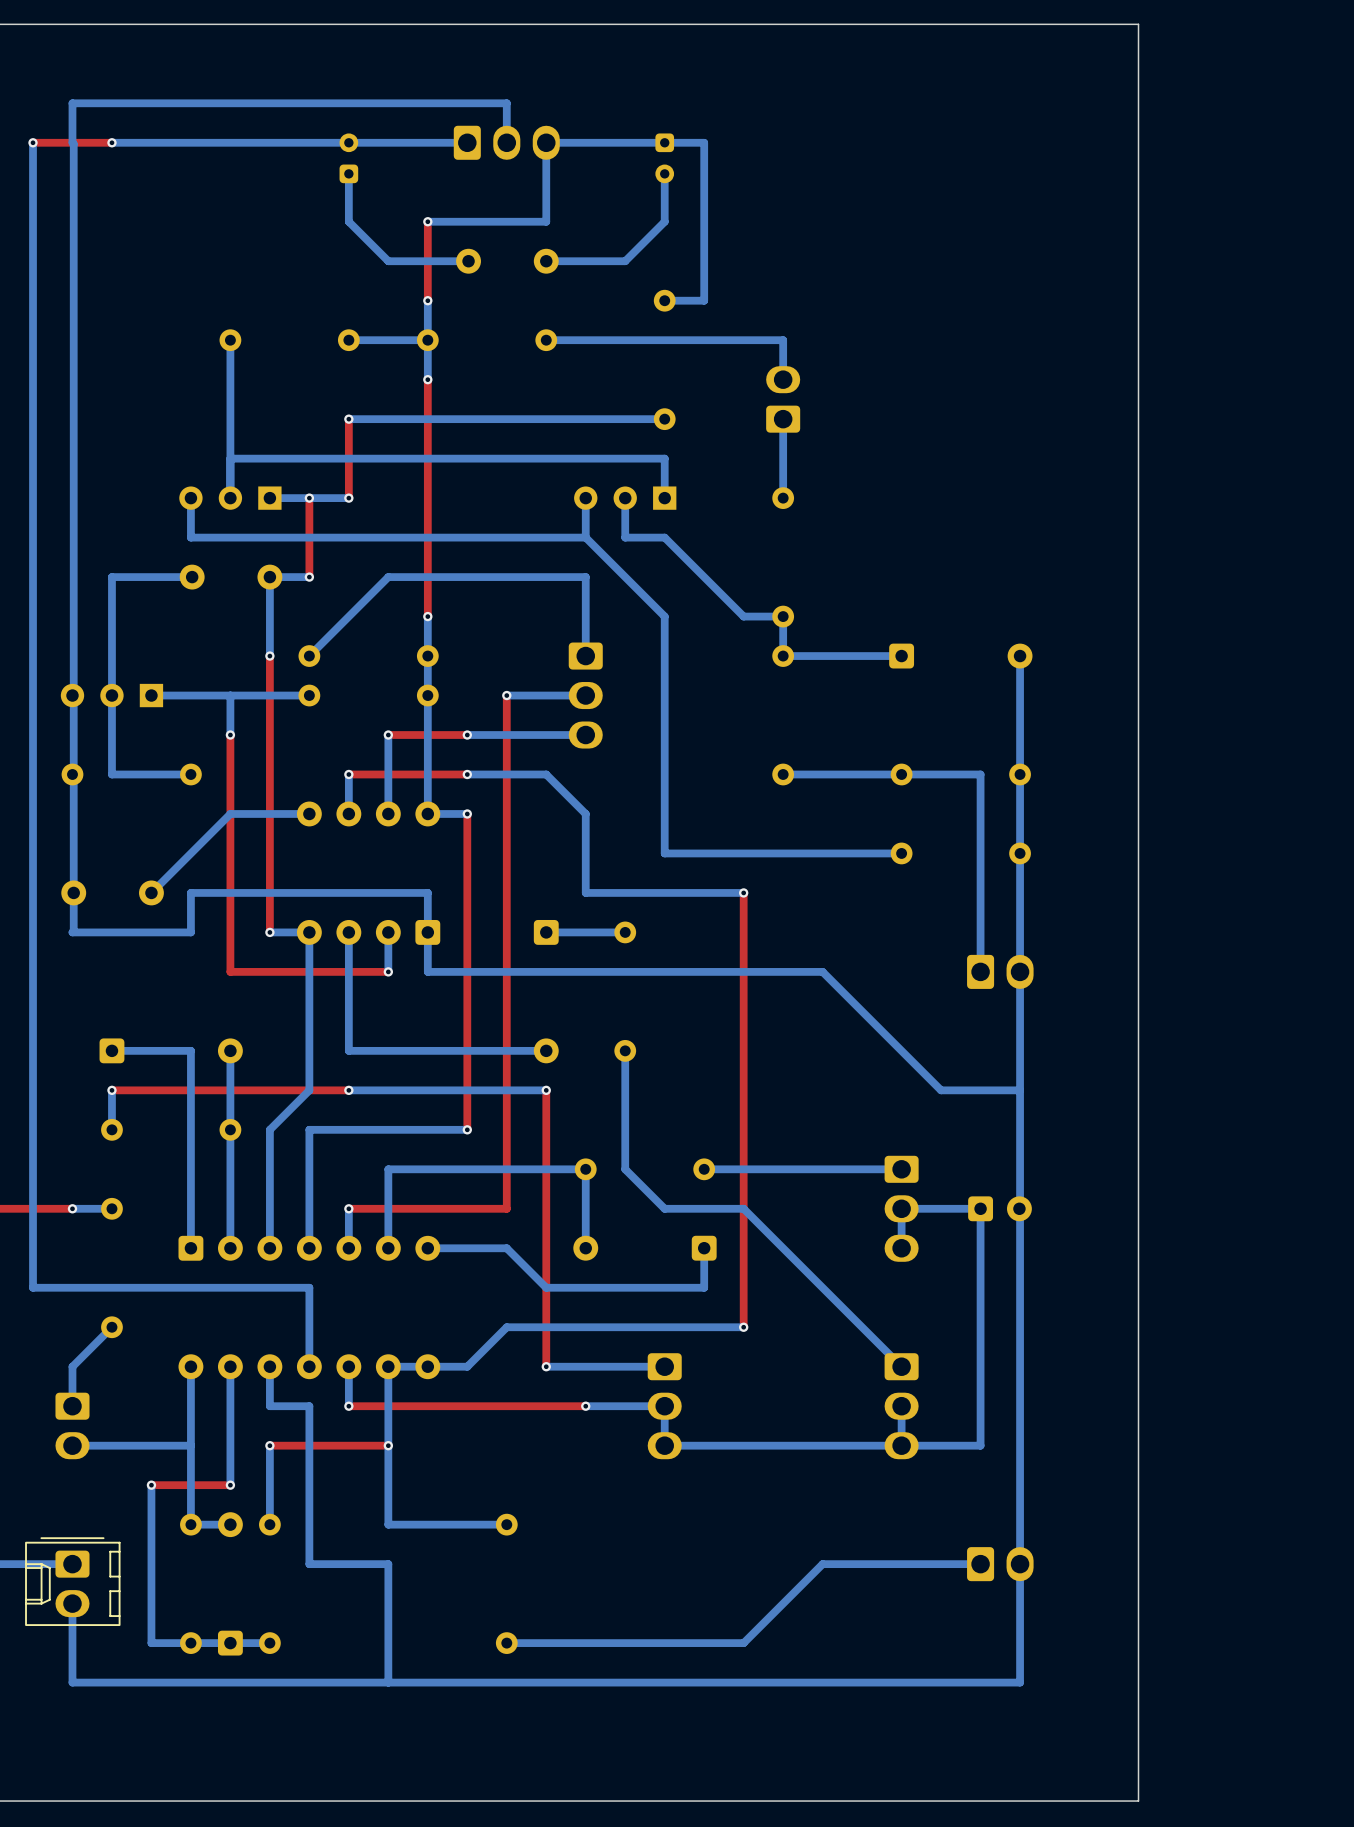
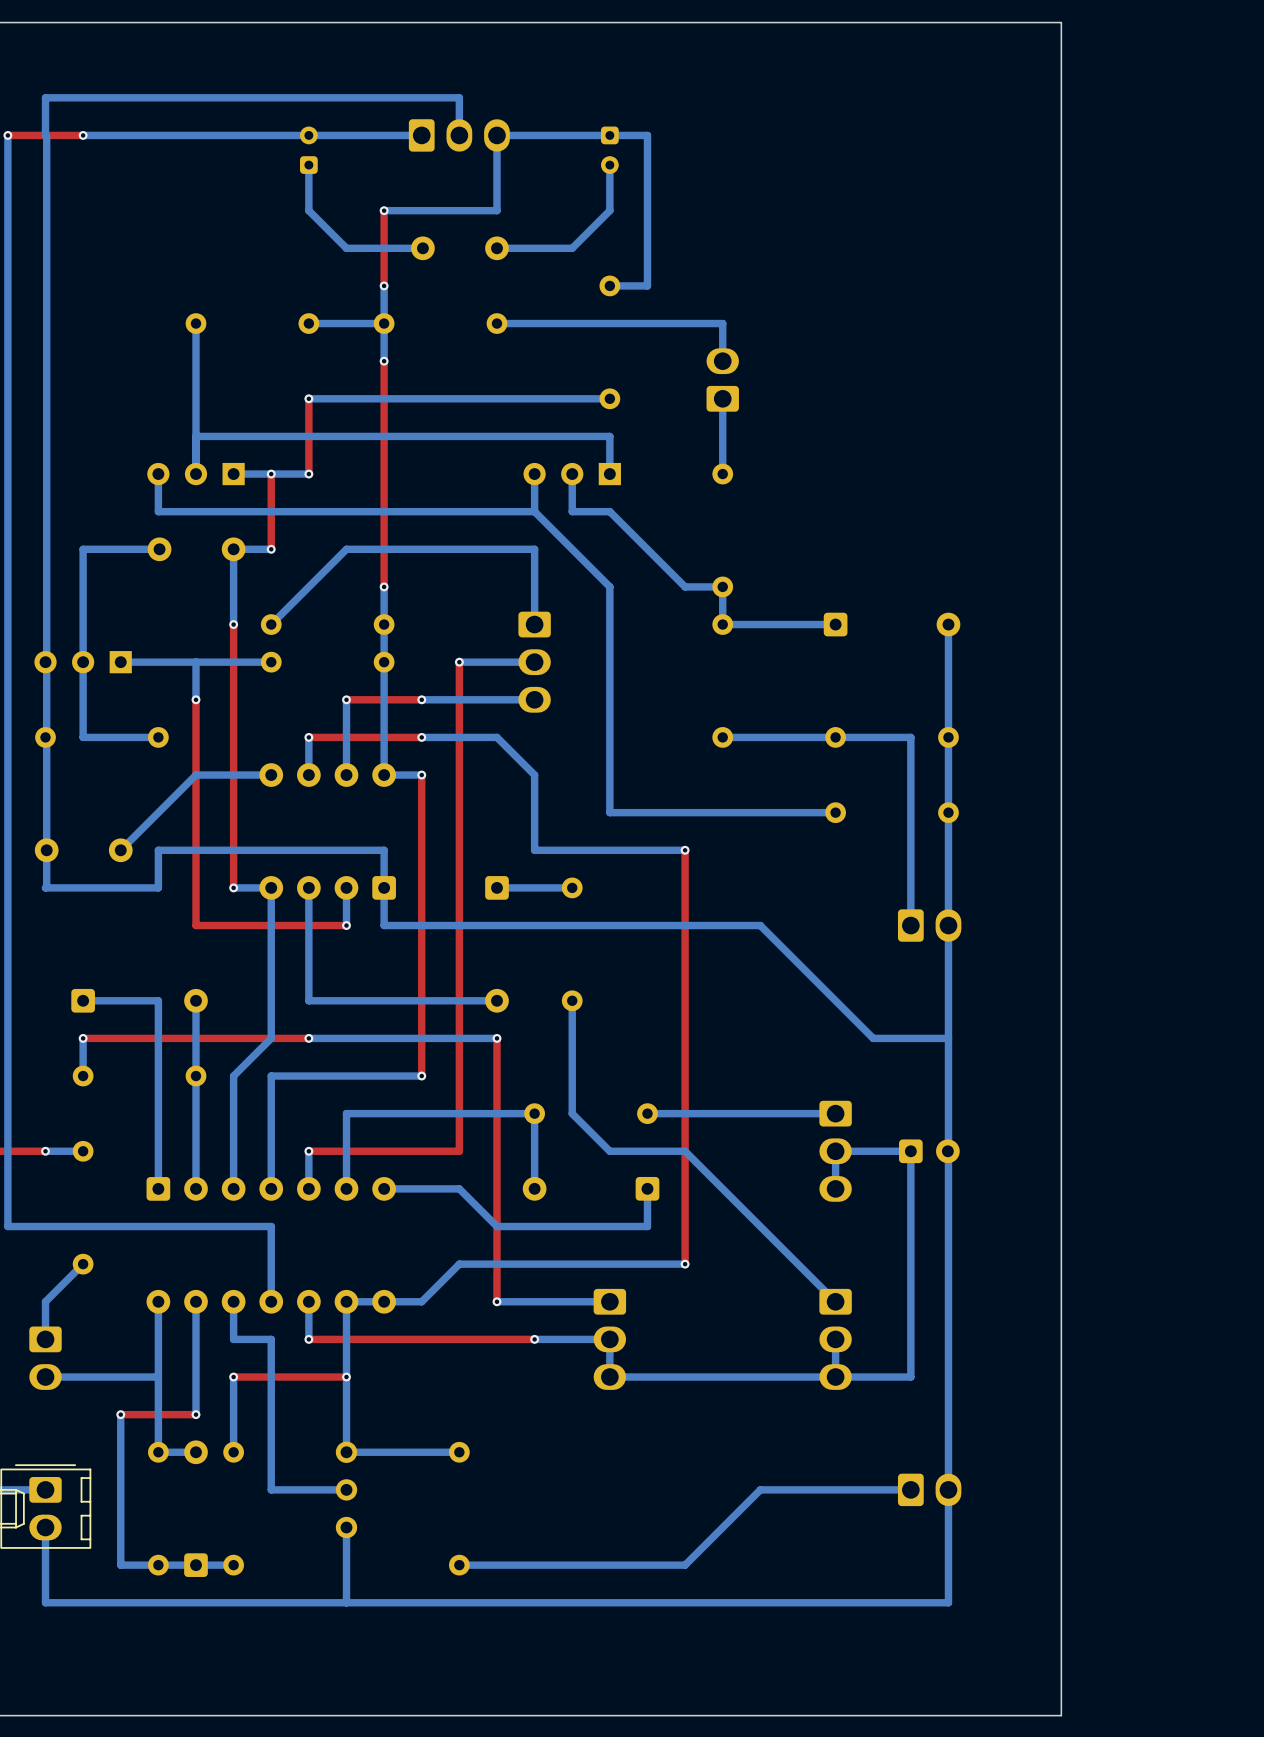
bottom track: (388, 1564) (388, 1603) -> none
part: none -> (346, 1489)

